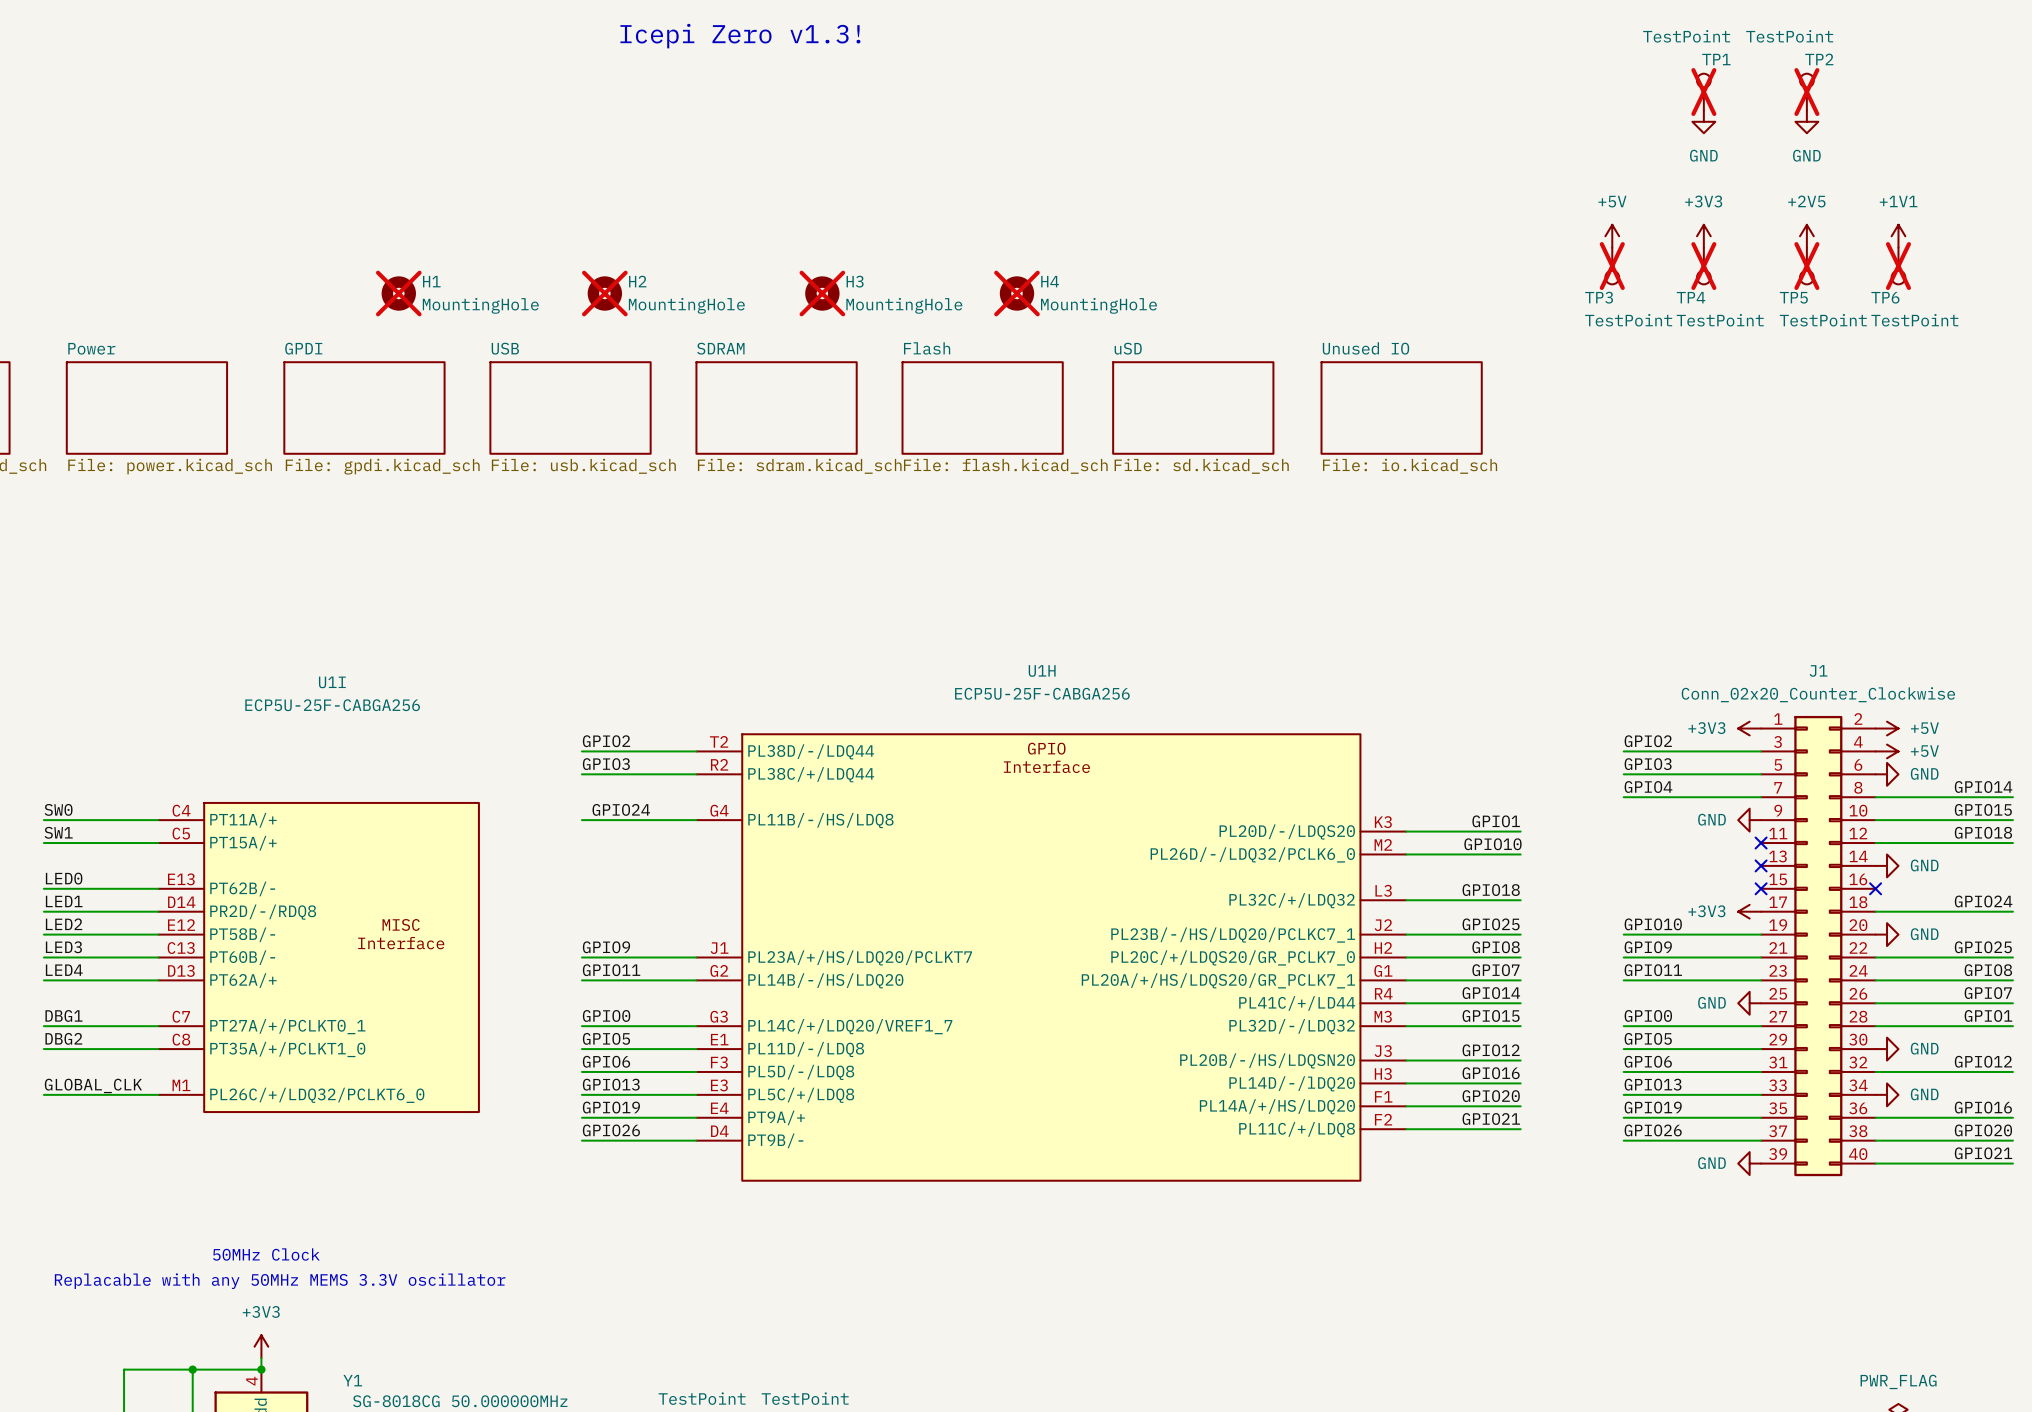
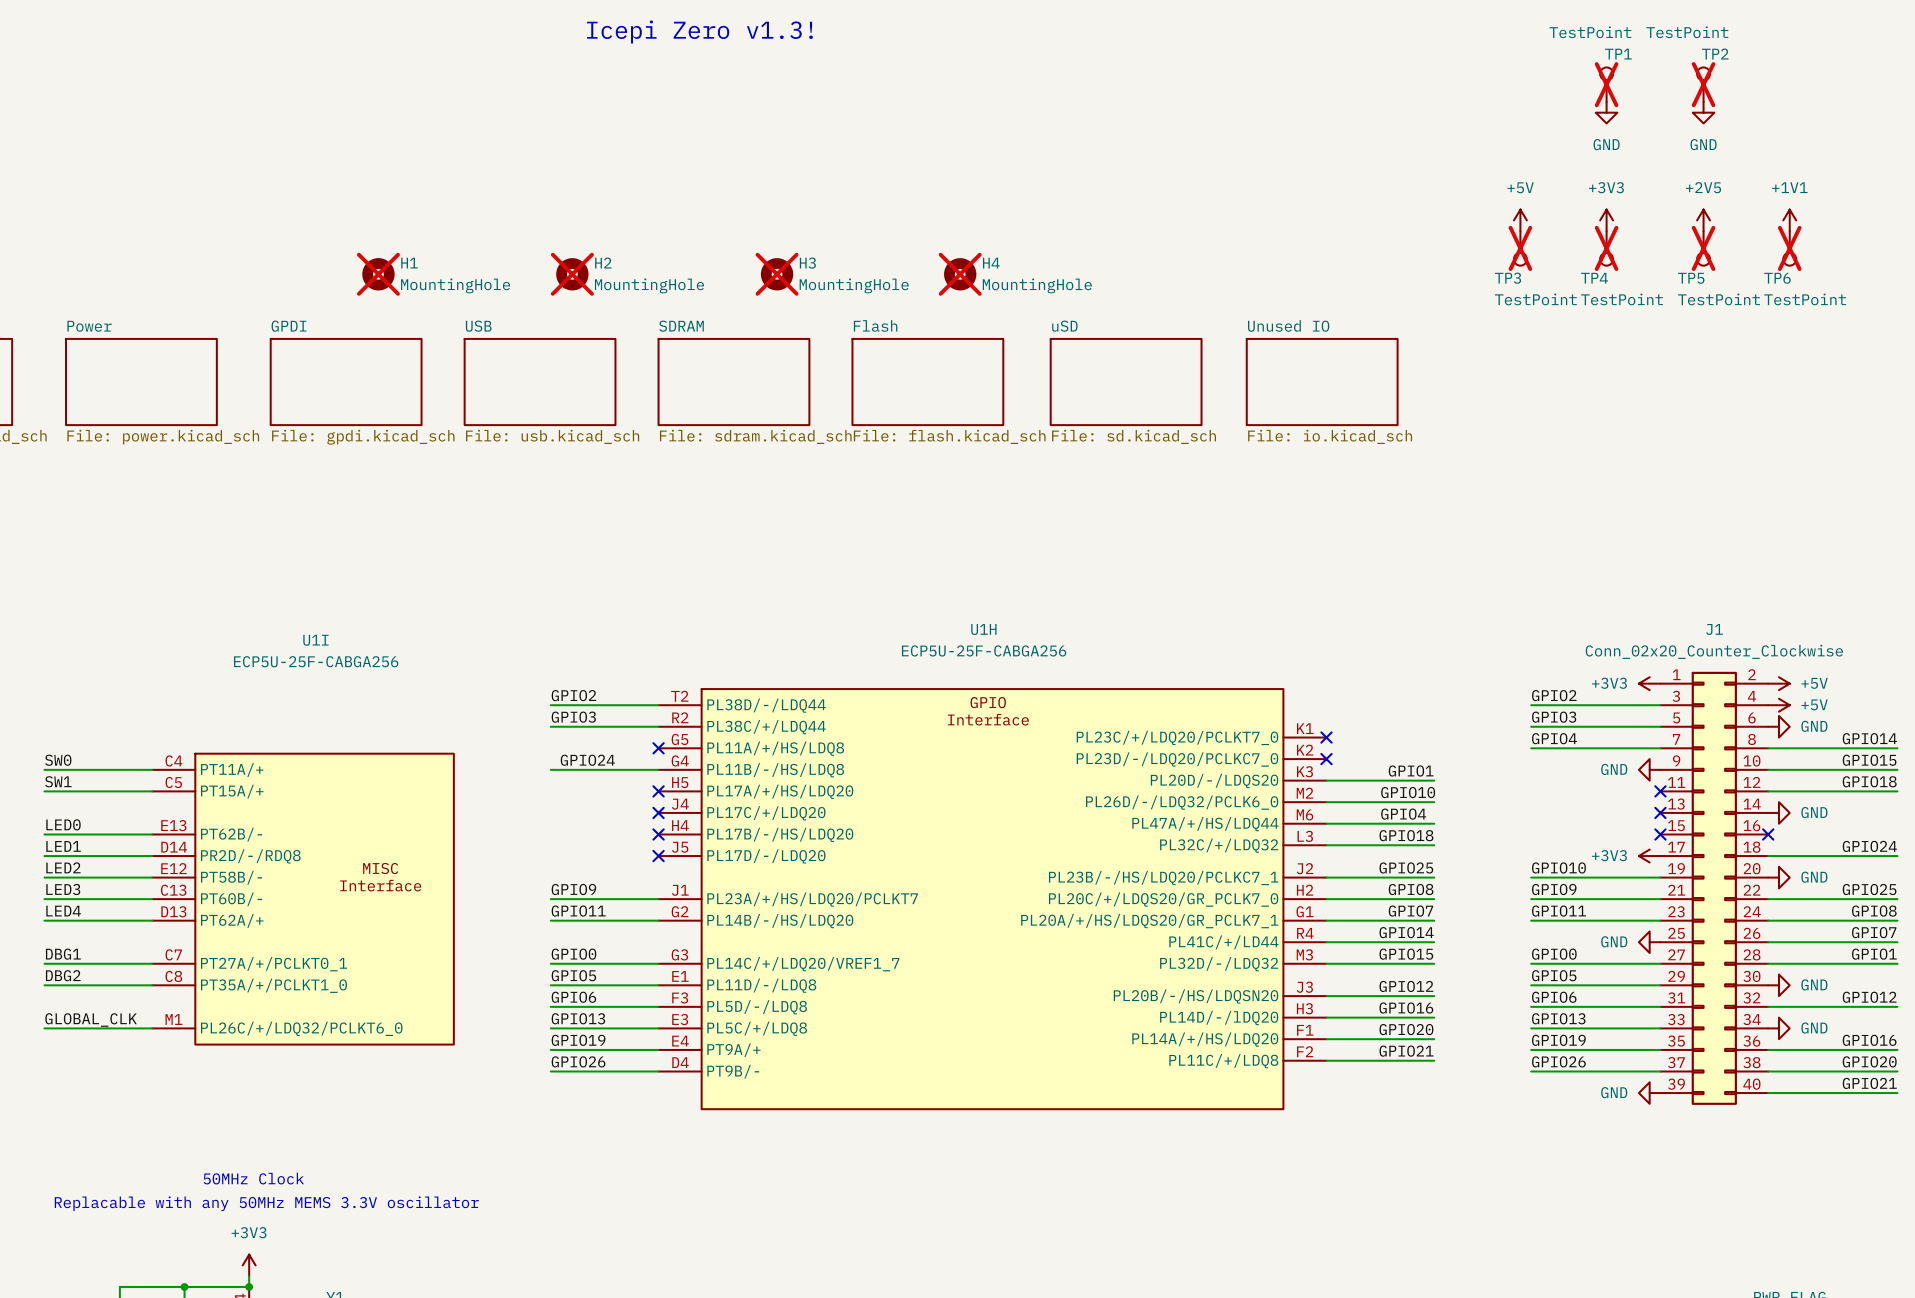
U1H symbol: [696, 734, 1407, 1181] -> [658, 689, 1327, 1110]
no-connect mark: none -> (1326, 737)
no-connect mark: none -> (658, 748)
no-connect mark: none -> (1326, 759)
no-connect mark: none -> (658, 791)
no-connect mark: none -> (658, 812)
label: none -> GPIO4 (1403, 814)
wire: none -> (1326, 823) (1434, 823)
no-connect mark: none -> (658, 834)
no-connect mark: none -> (658, 856)

